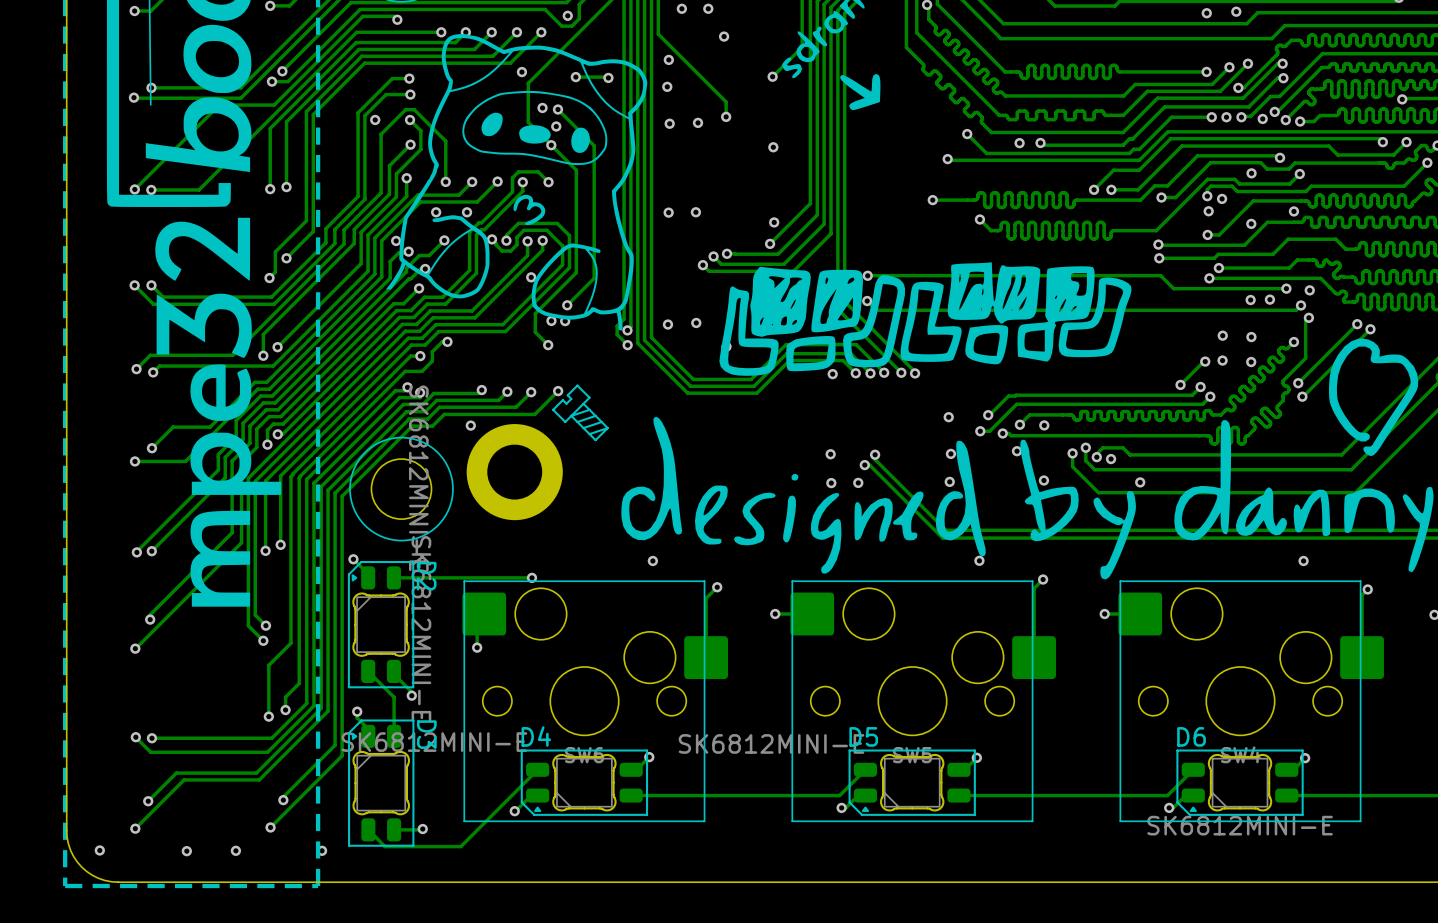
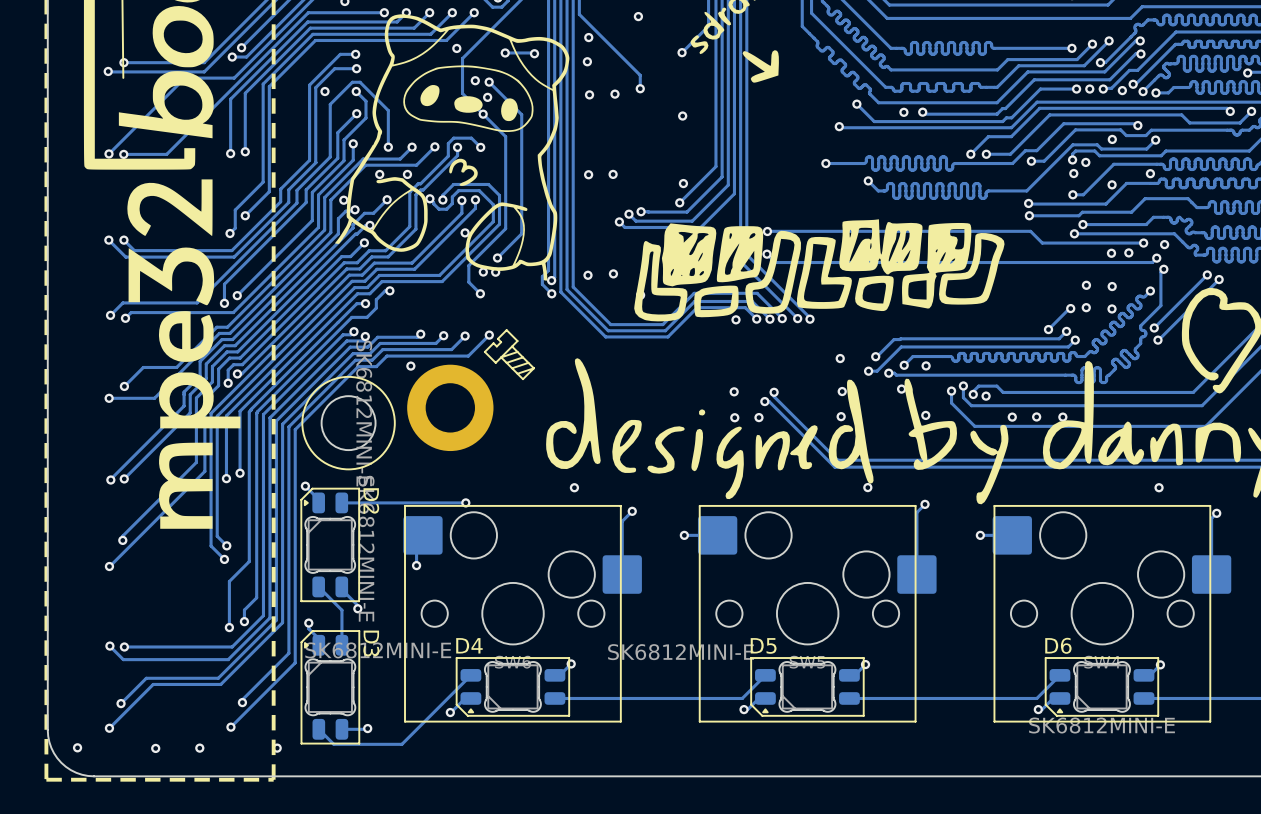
via: none -> (1036, 416)
via: none -> (1062, 417)

